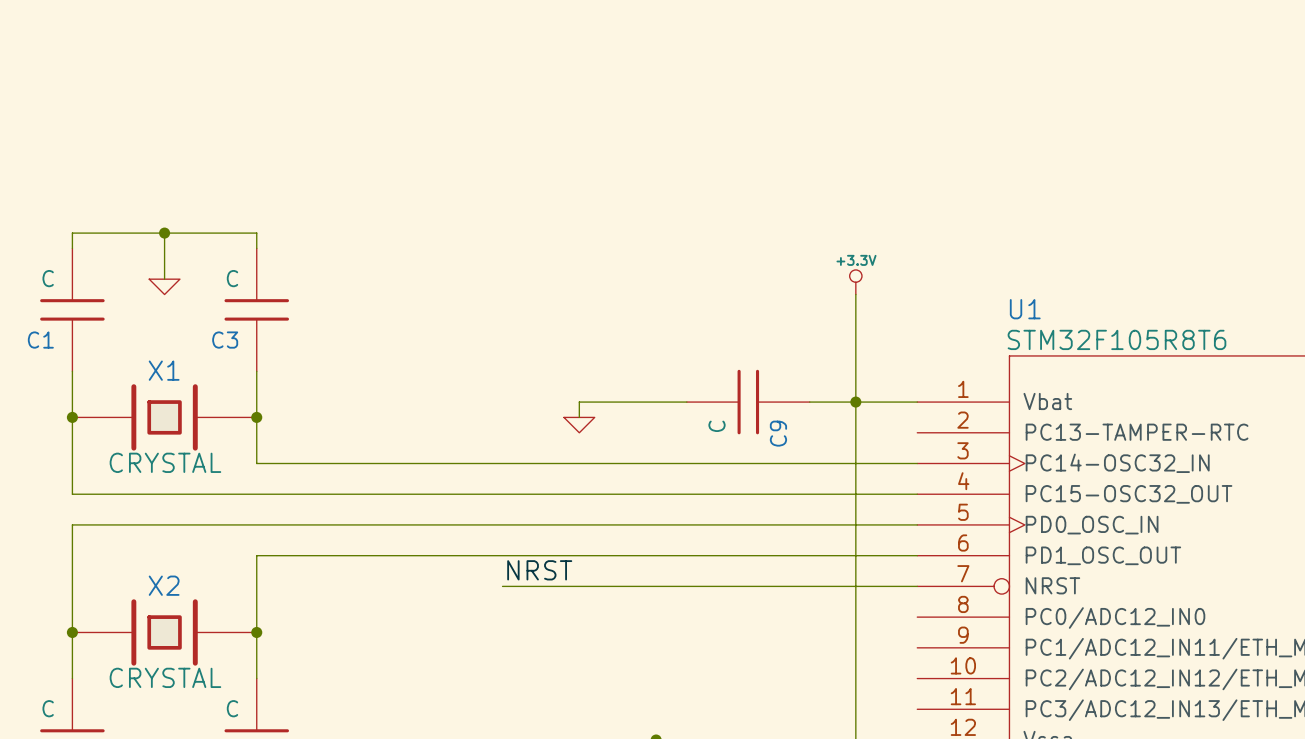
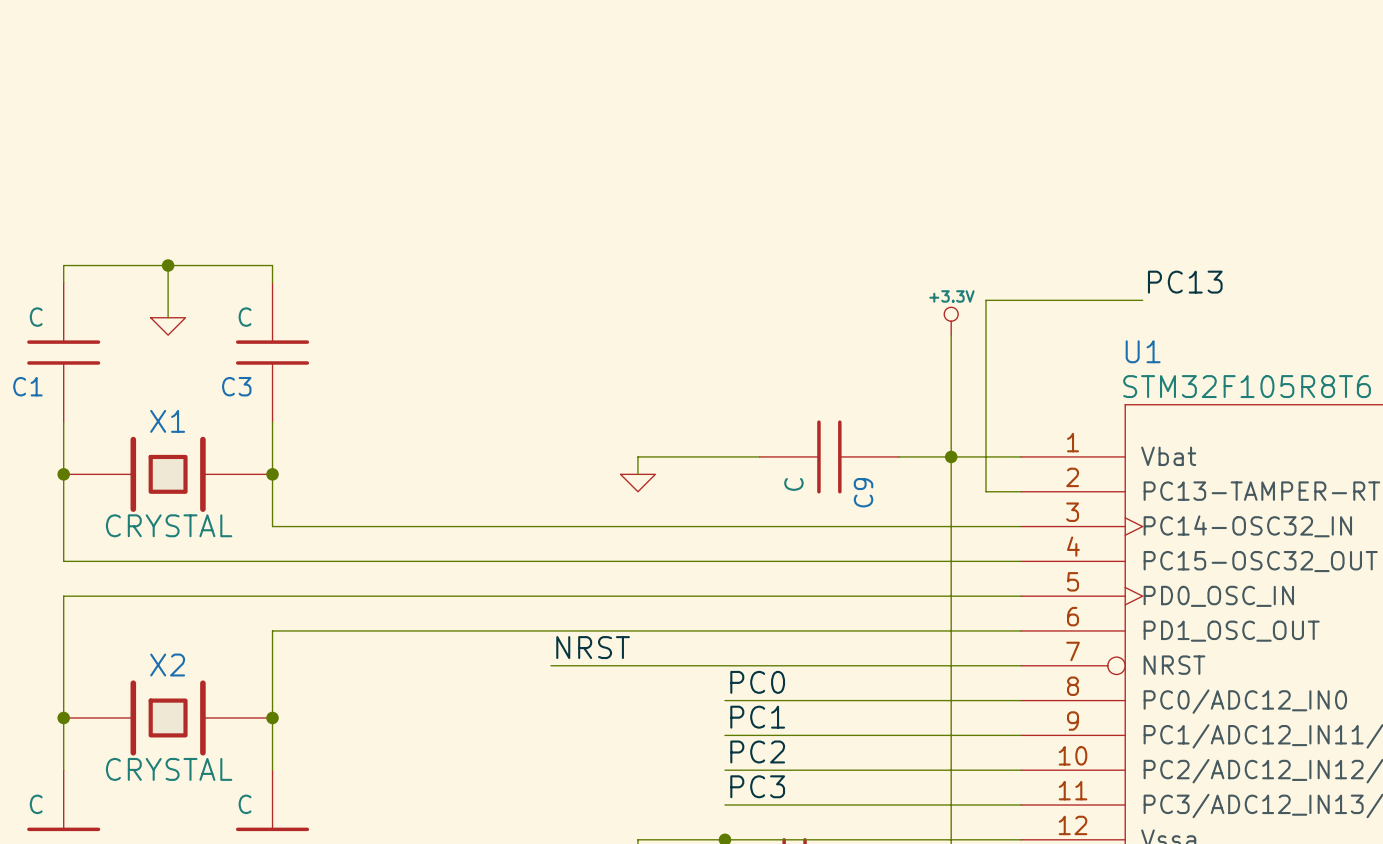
label: none -> PC13 (1185, 282)
wire: none -> (1142, 300) (986, 300) (986, 491) (1020, 491)
label: none -> PC0 (757, 682)
wire: none -> (724, 700) (1020, 700)
label: none -> PC1 (757, 717)
wire: none -> (724, 735) (1020, 735)
label: none -> PC2 (757, 751)
wire: none -> (724, 770) (1020, 770)
label: none -> PC3 (757, 786)
wire: none -> (724, 805) (1020, 805)

